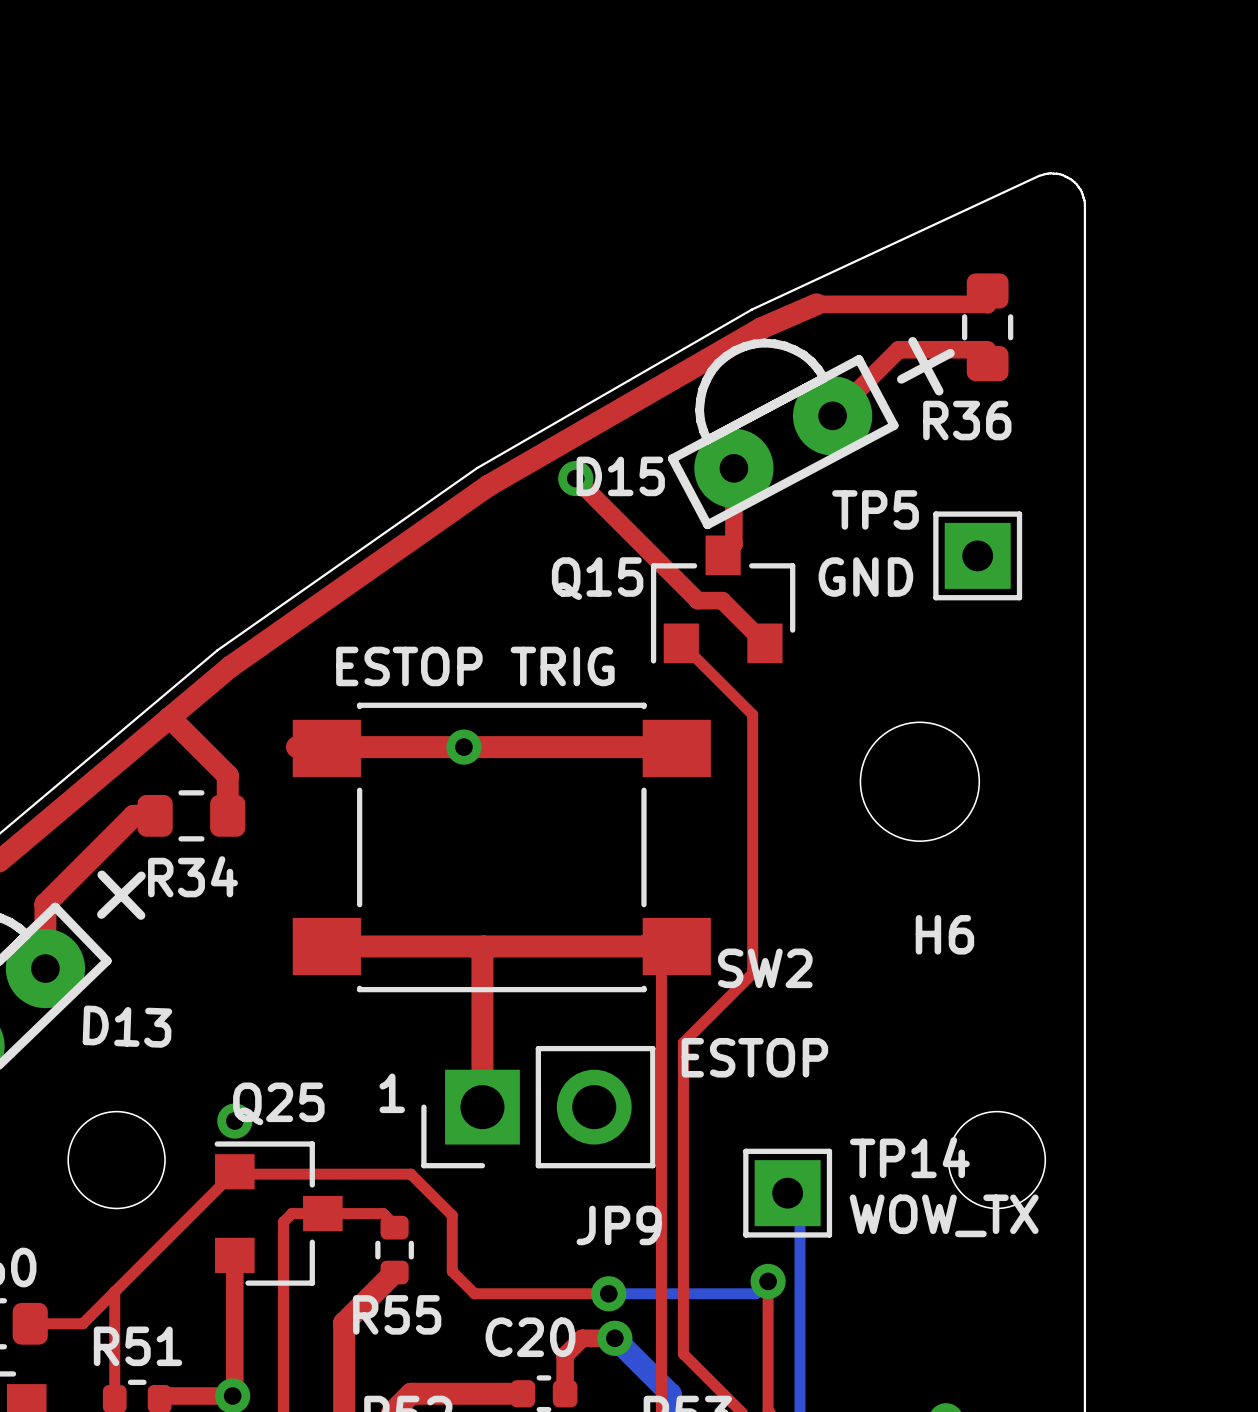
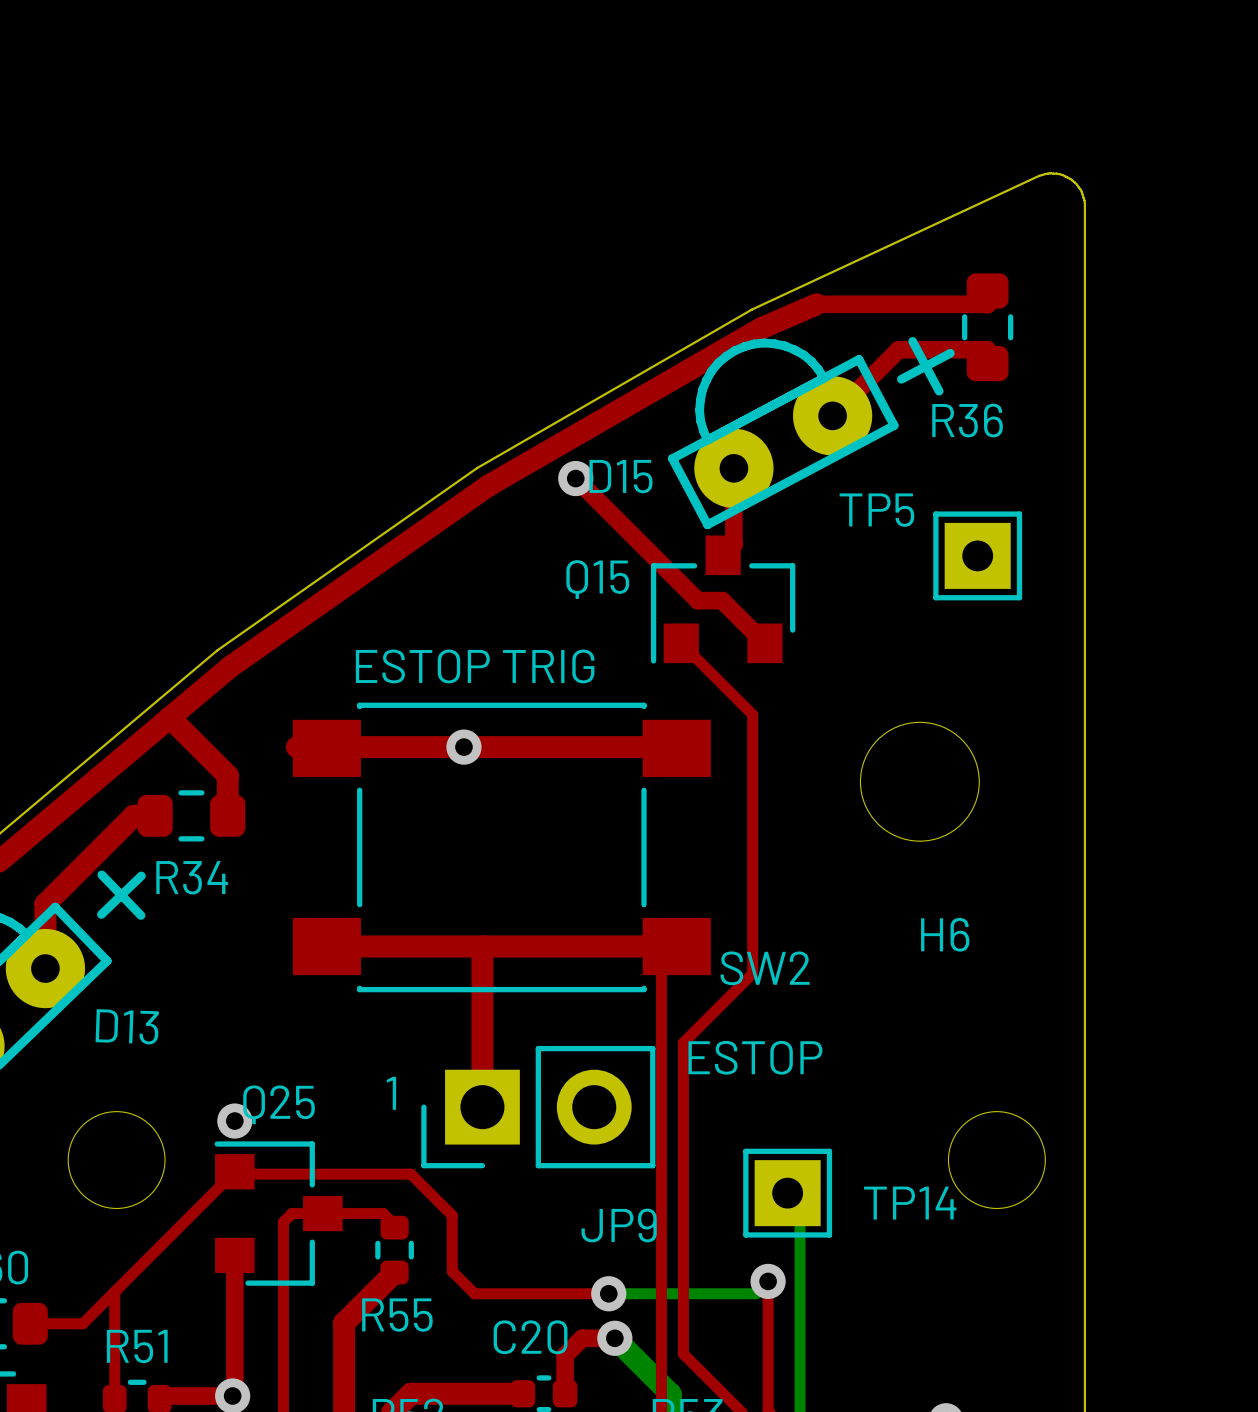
text: GND (865, 577) -> none
TP14 name position: TP14 (909, 1157) -> TP14 (910, 1203)
text: WOW_TX (944, 1215) -> none

